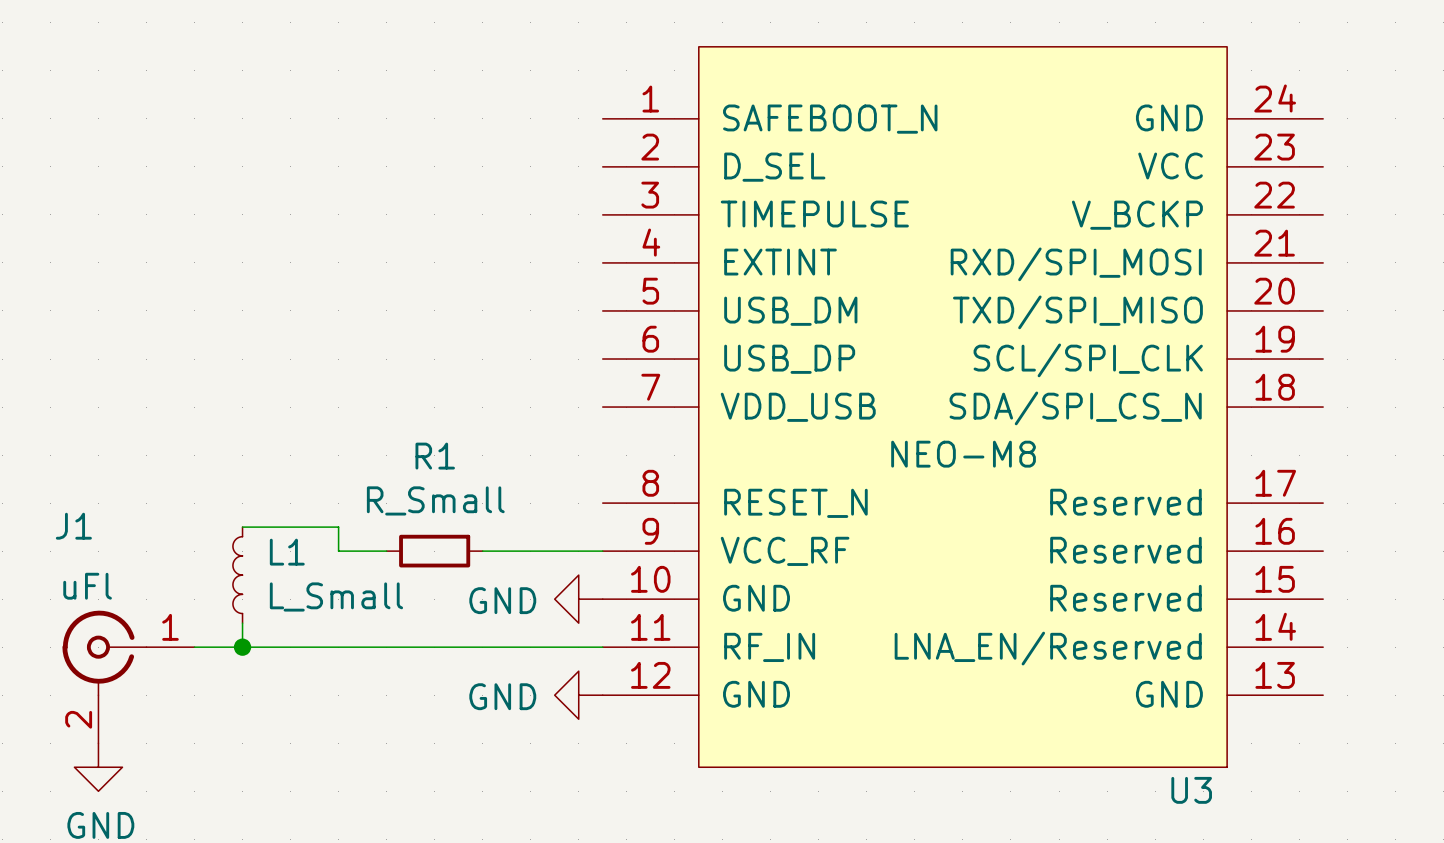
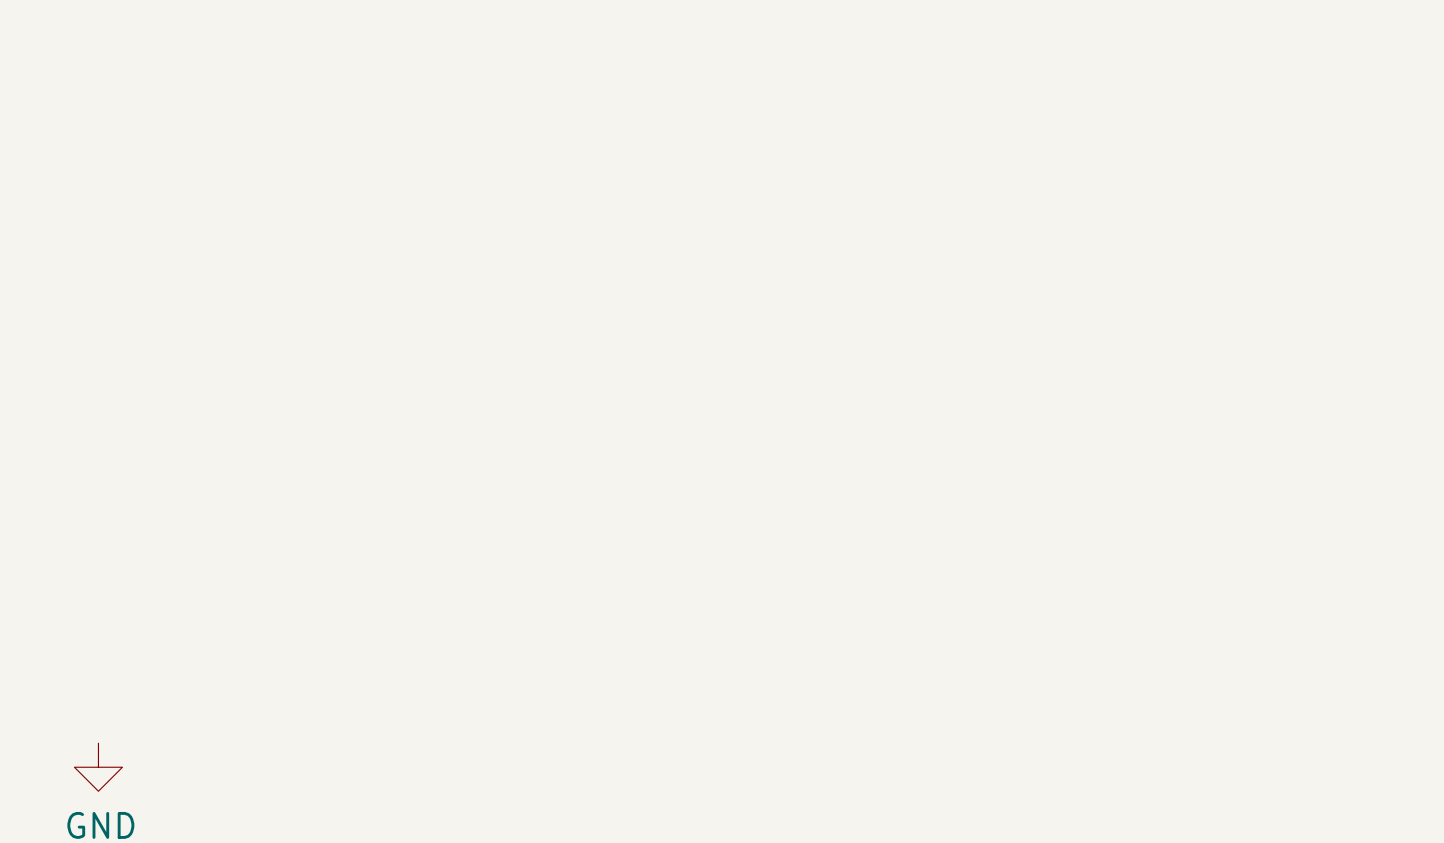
U3: NEO-M8 (962, 407) -> none
wire: (242, 527) (338, 527) (338, 551) (386, 551) -> none
R1: R_Small (434, 551) -> none
wire: (482, 551) (602, 551) -> none
L1: L_Small (237, 575) -> none
power symbol: GND (578, 599) -> none
wire: (242, 623) (242, 647) -> none
wire: (194, 647) (602, 647) -> none
junction: (242, 647) -> none
J1: uFl (128, 676) -> none
power symbol: GND (578, 695) -> none

